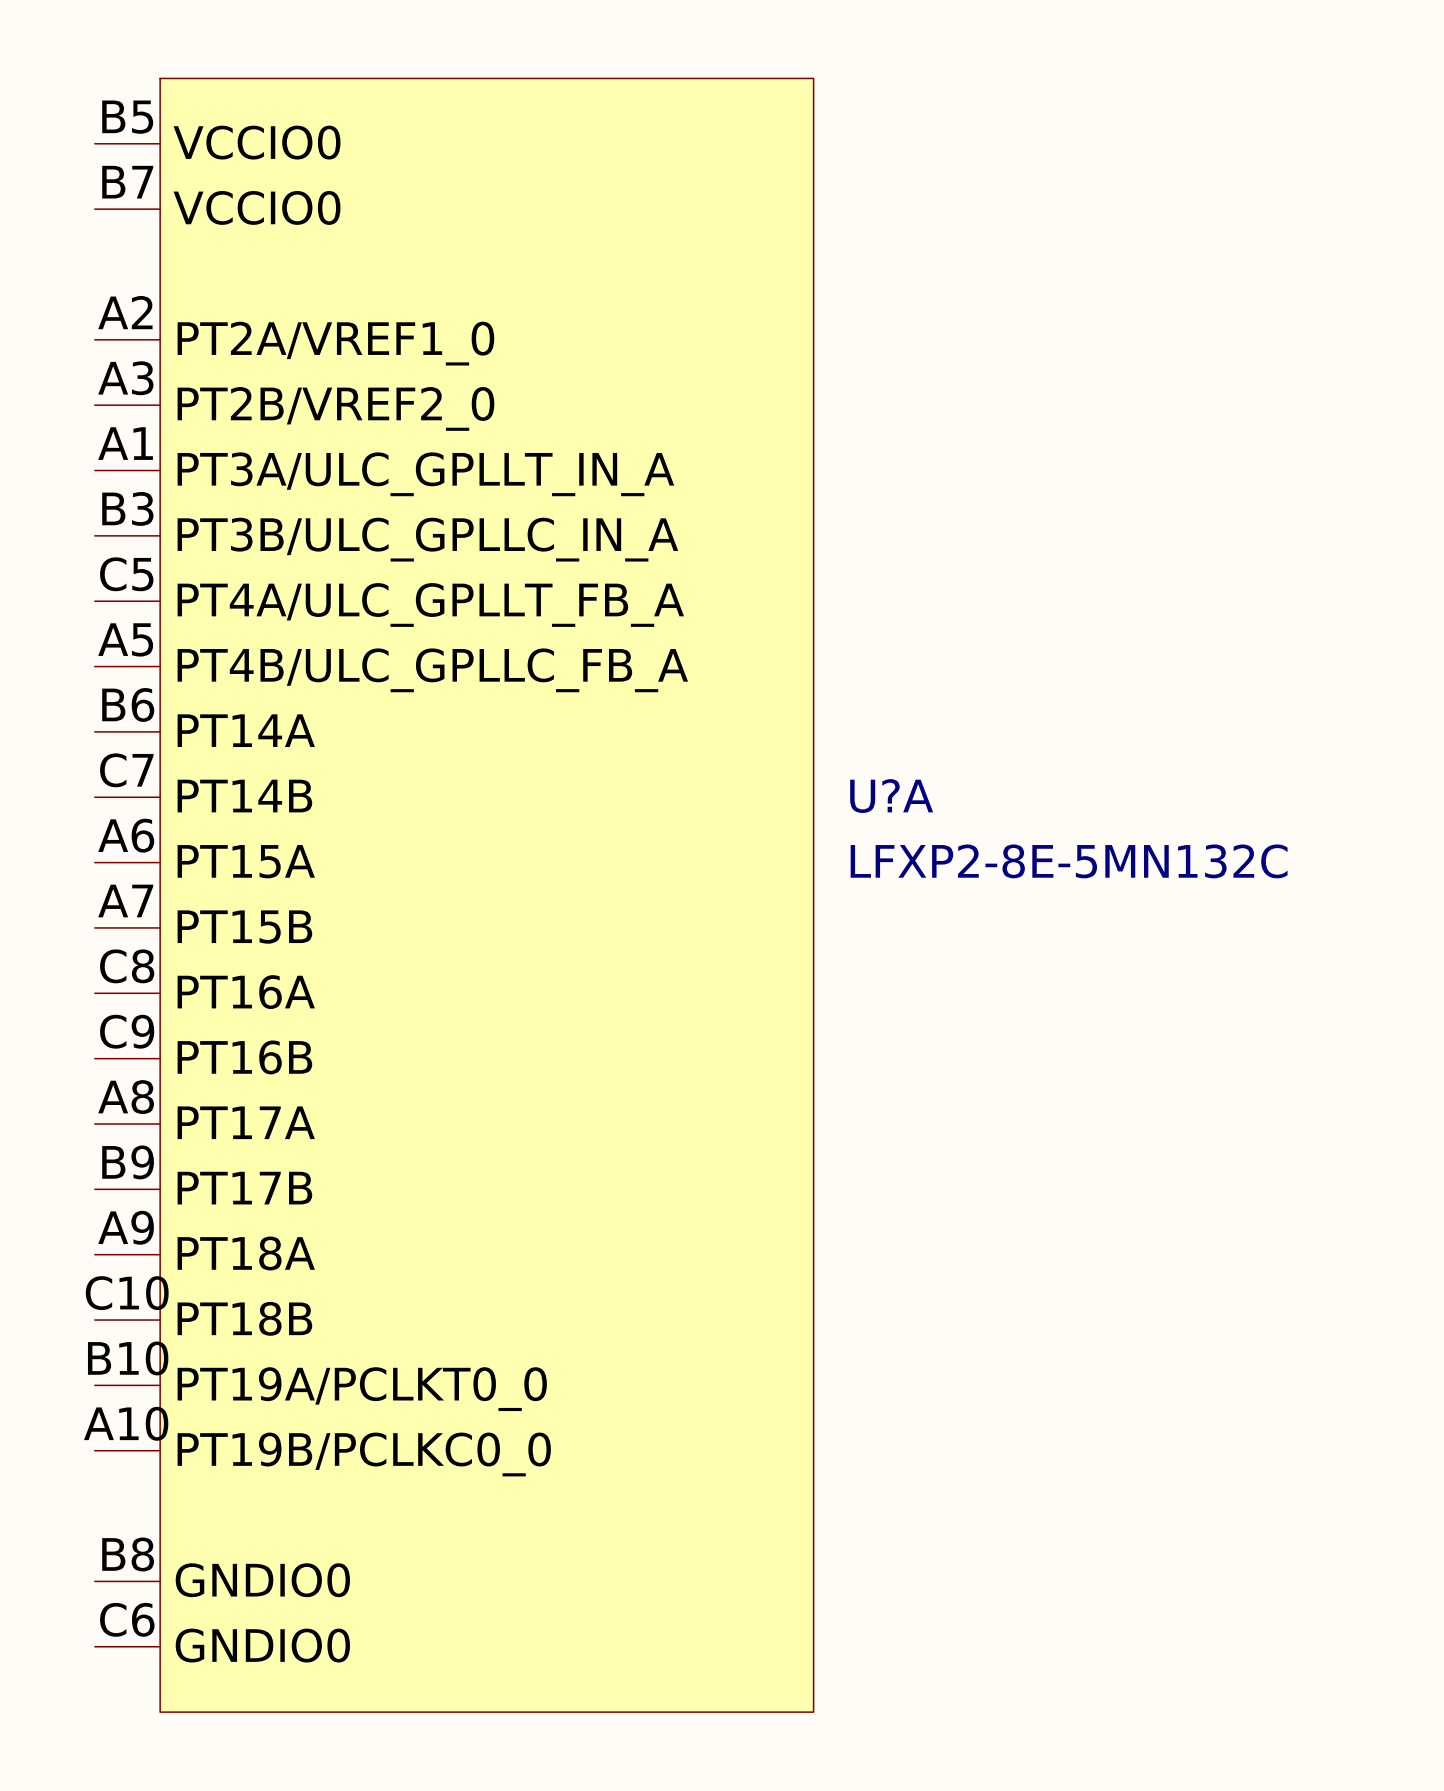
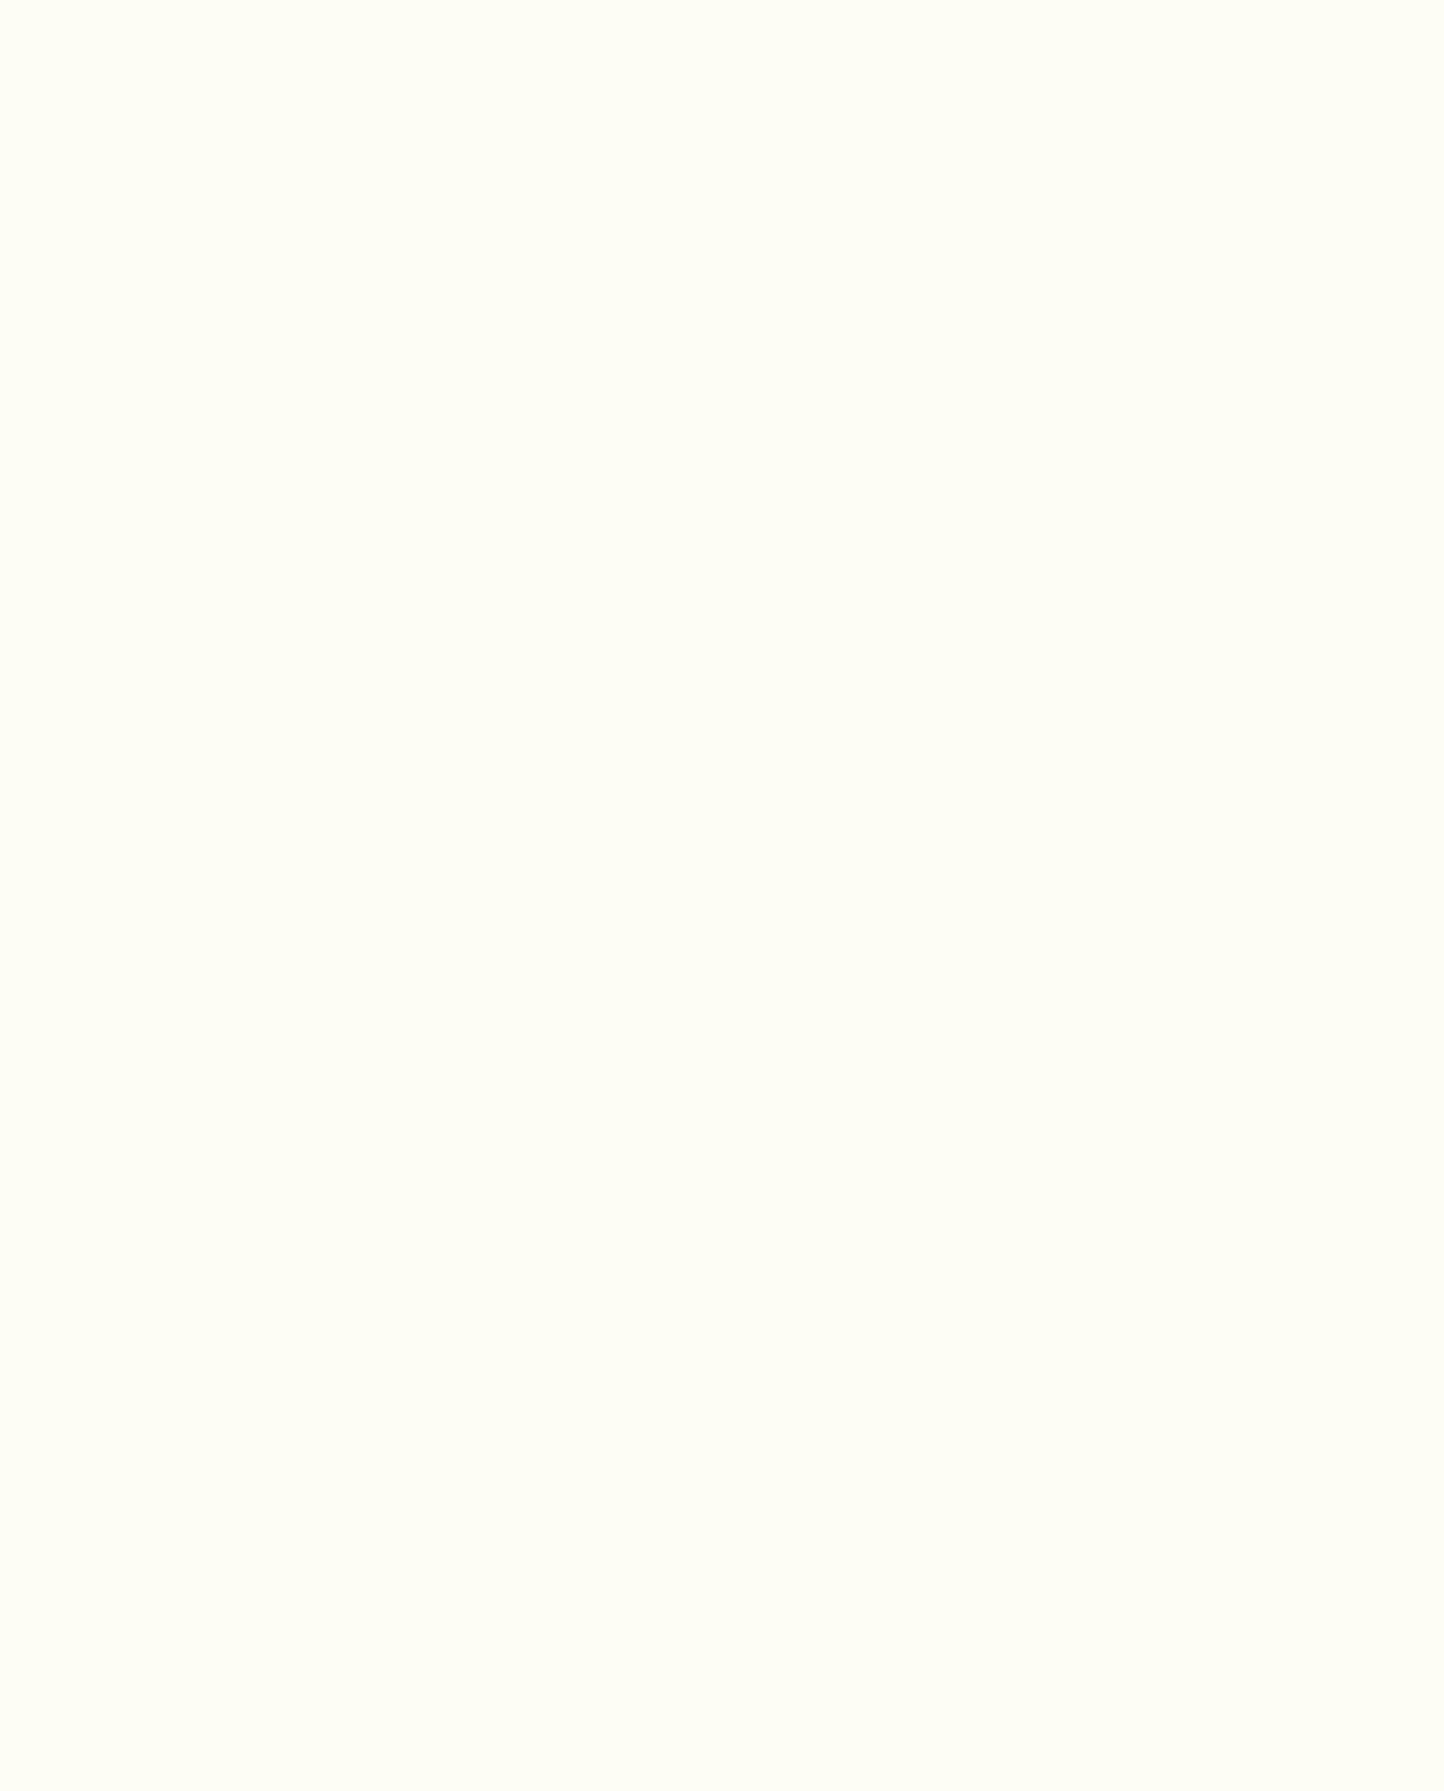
U?A: LFXP2-8E-5MN132C (454, 895) -> none

